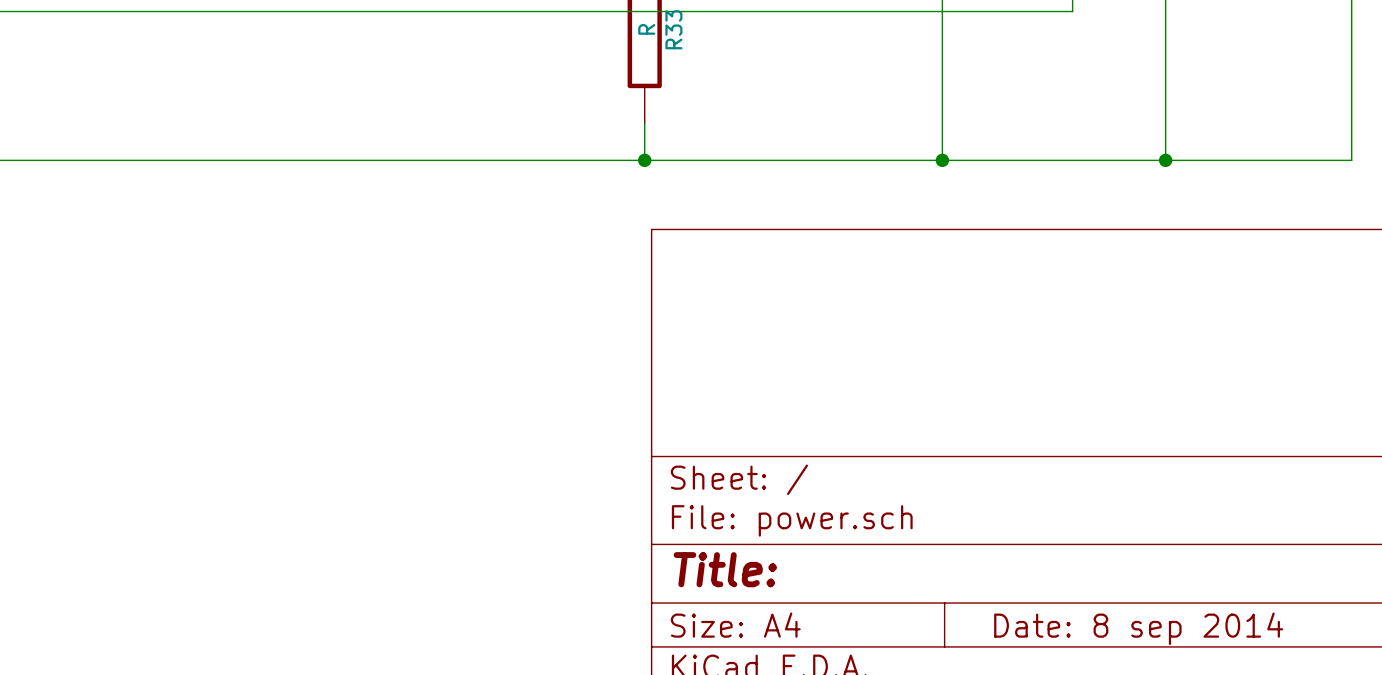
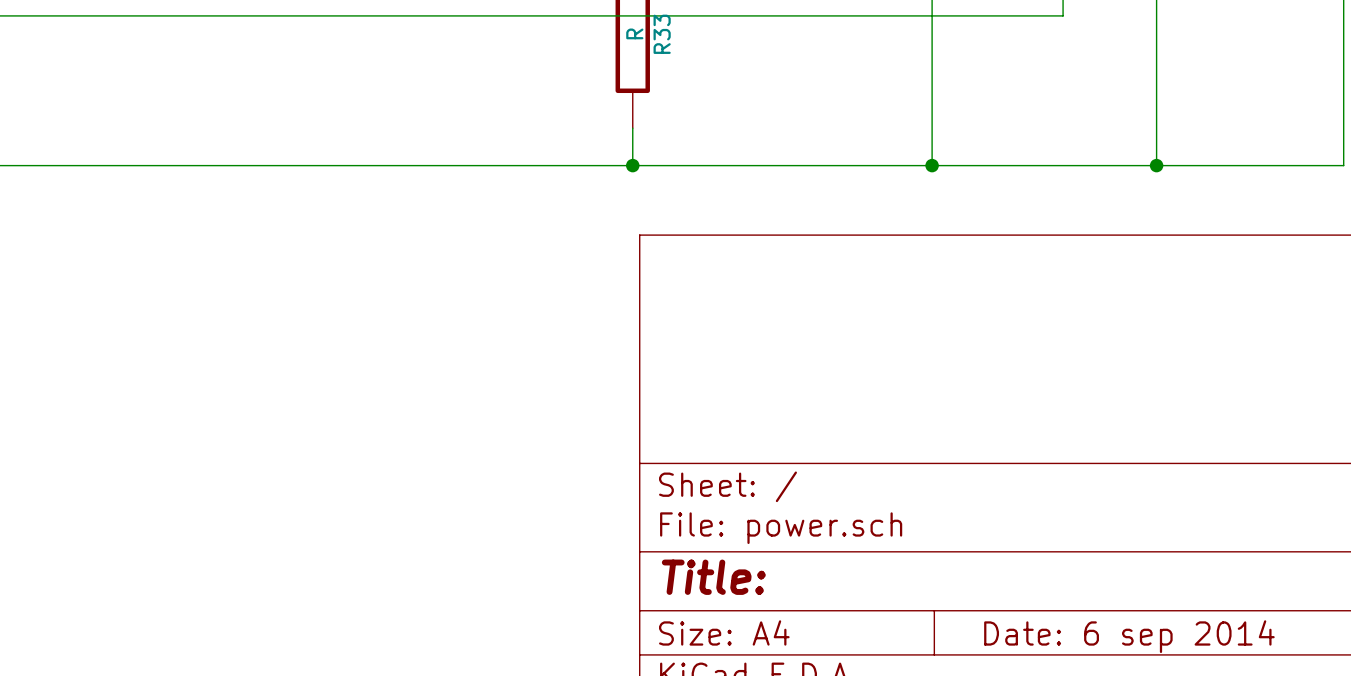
title block: Date: 8 sep 2014 (1138, 628) -> Date: 6 sep 2014 (1129, 636)

